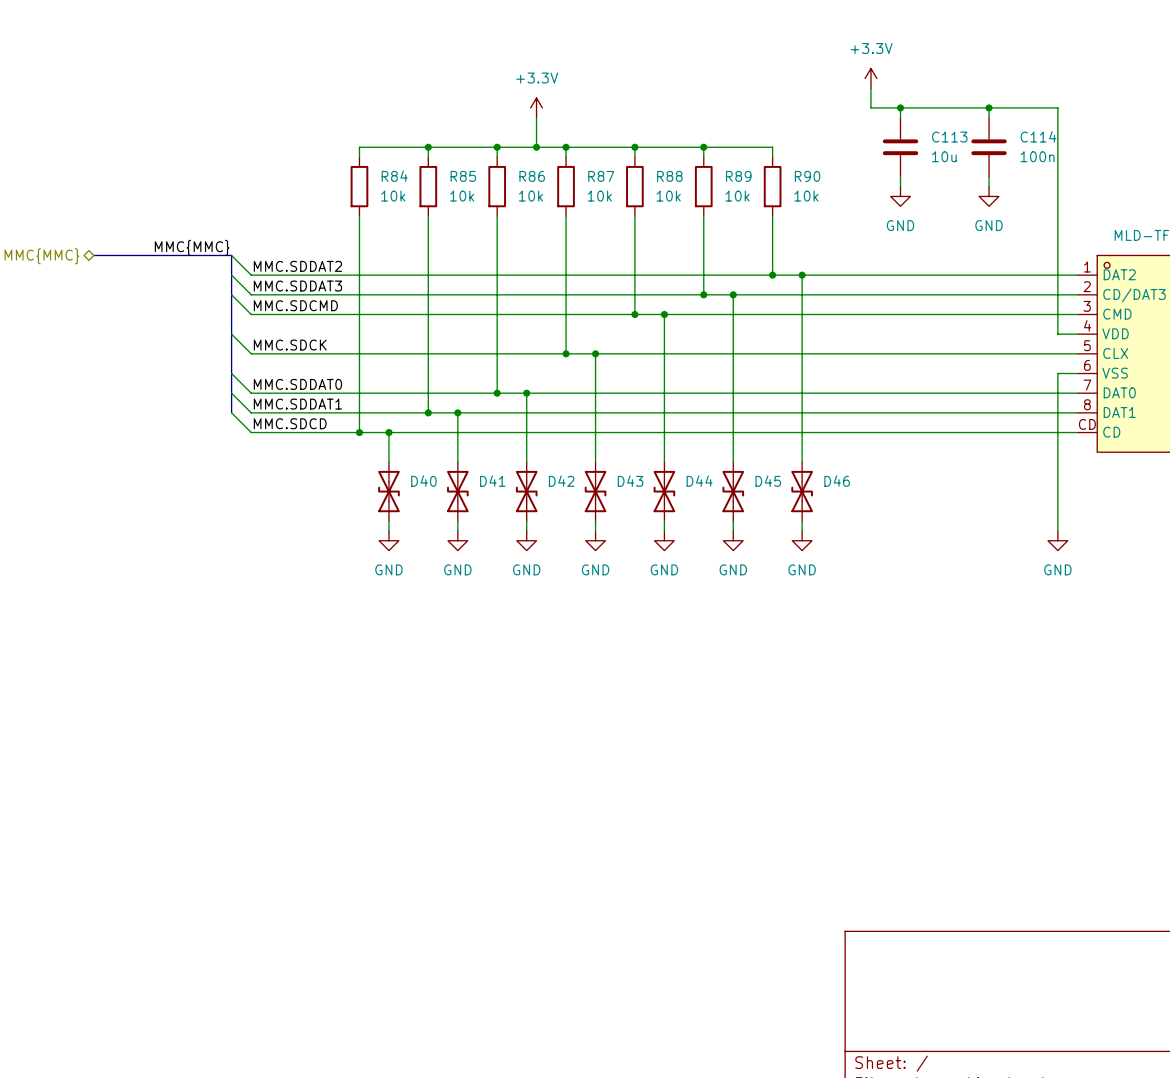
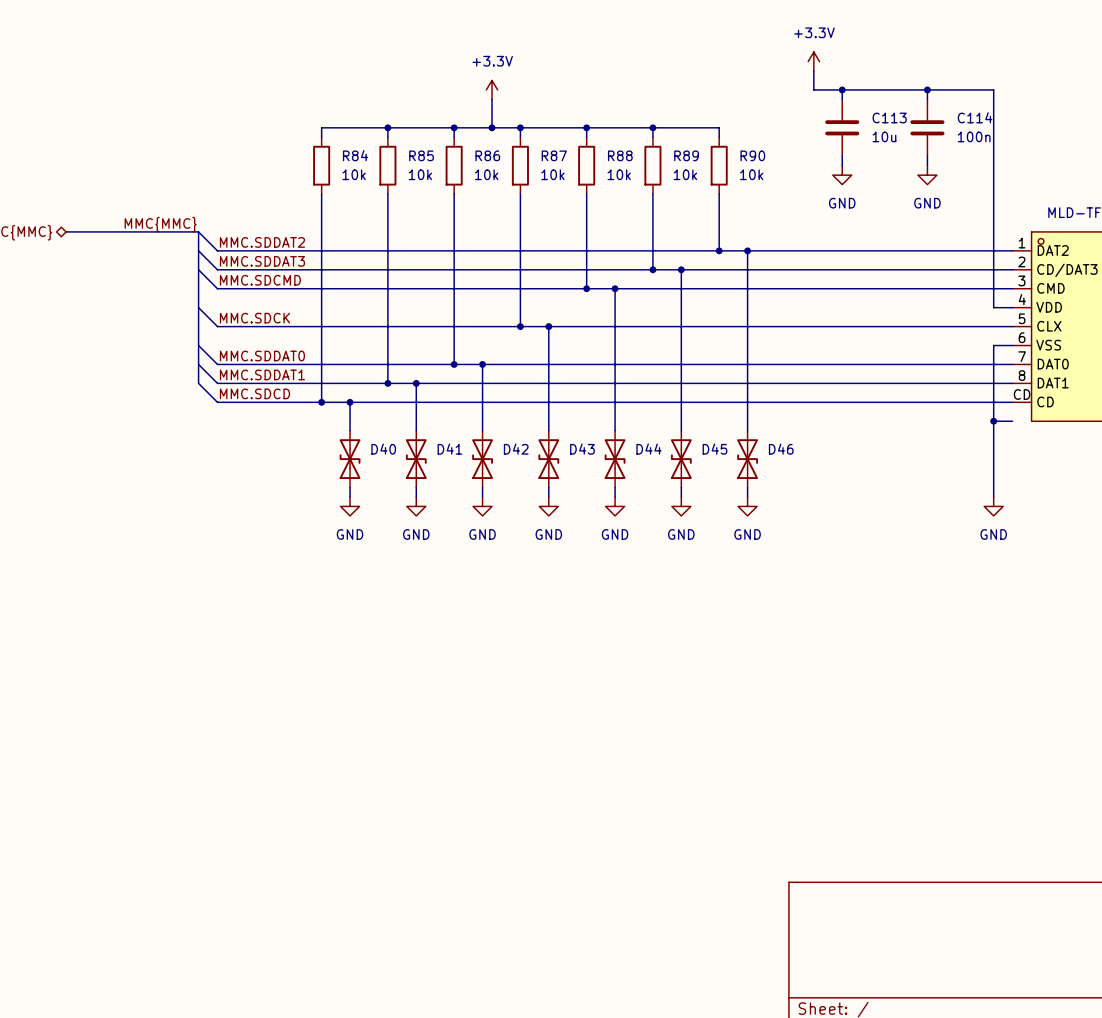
wire: none -> (993, 421) (1012, 421)
junction: none -> (993, 421)

